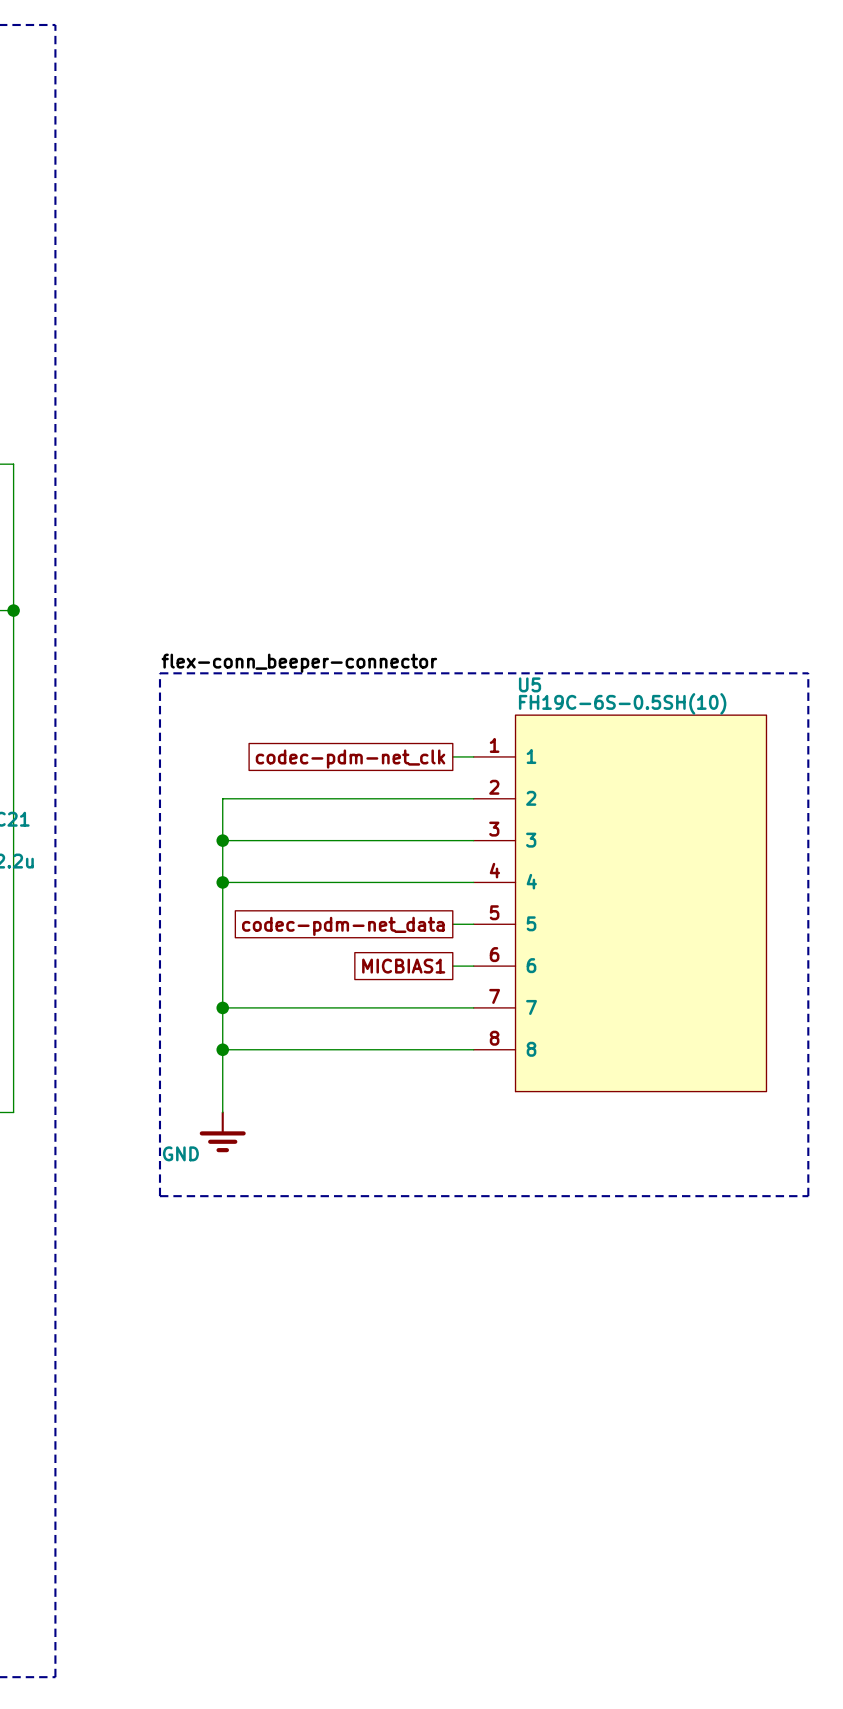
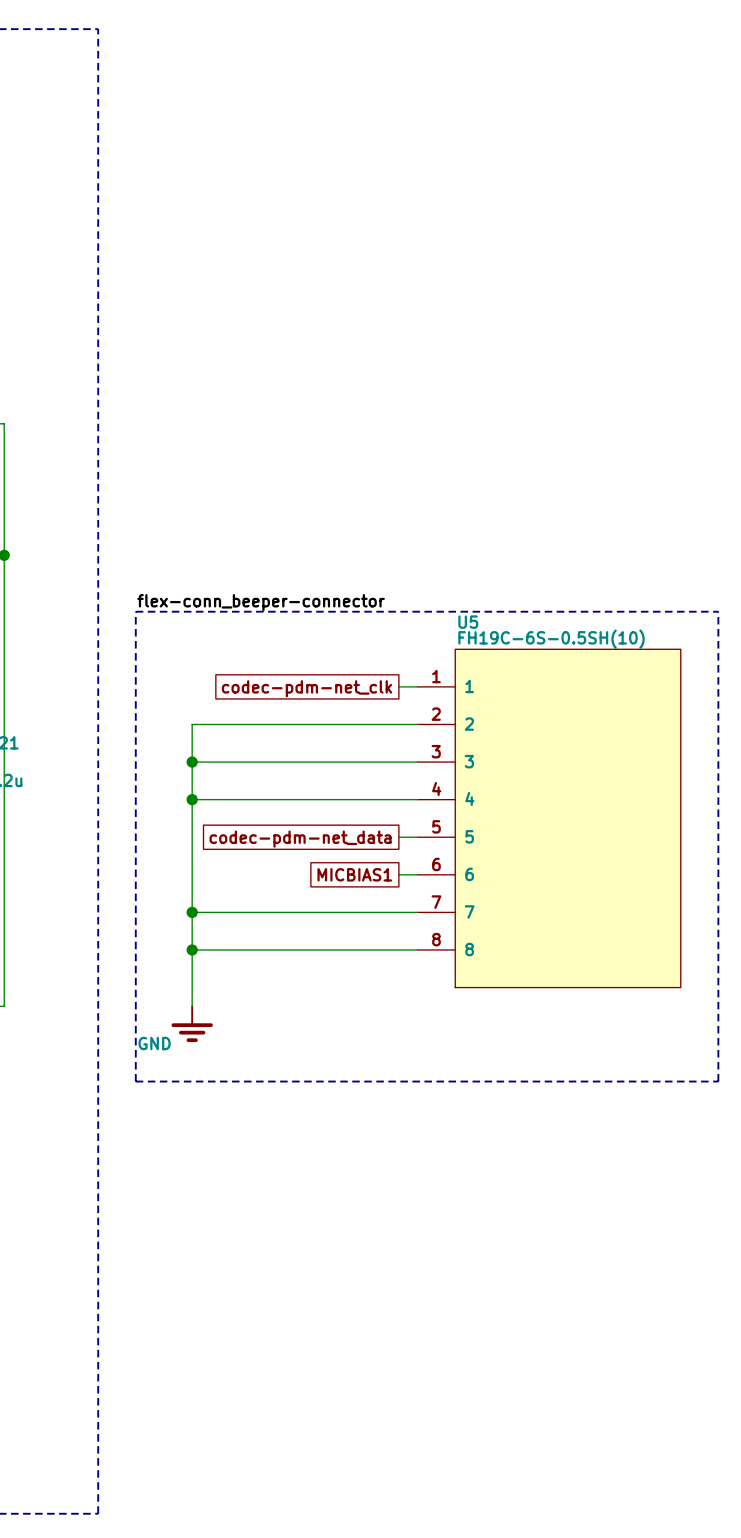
line: (55, 24) (55, 1677) -> (41, 29) (98, 29) (98, 1513) (41, 1513)

